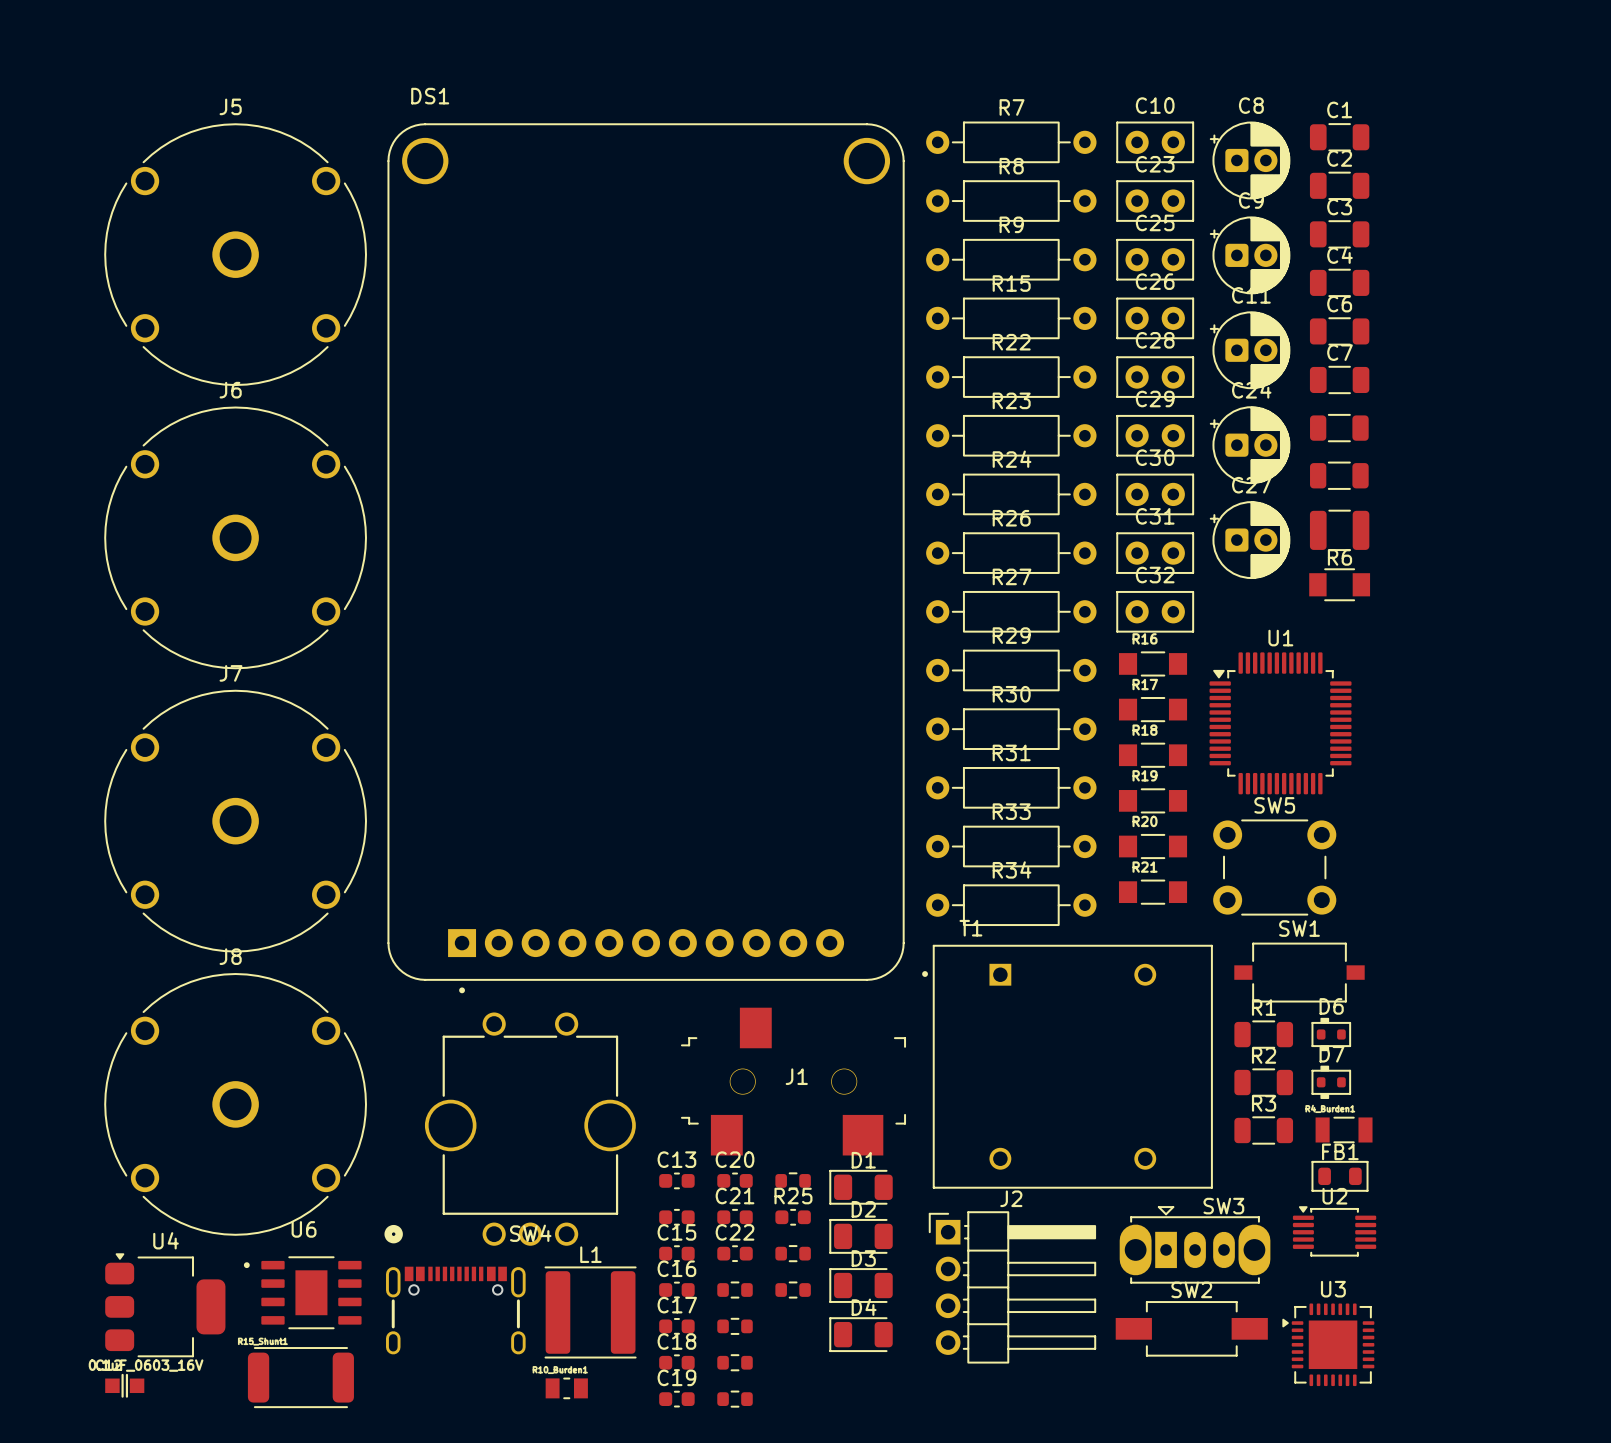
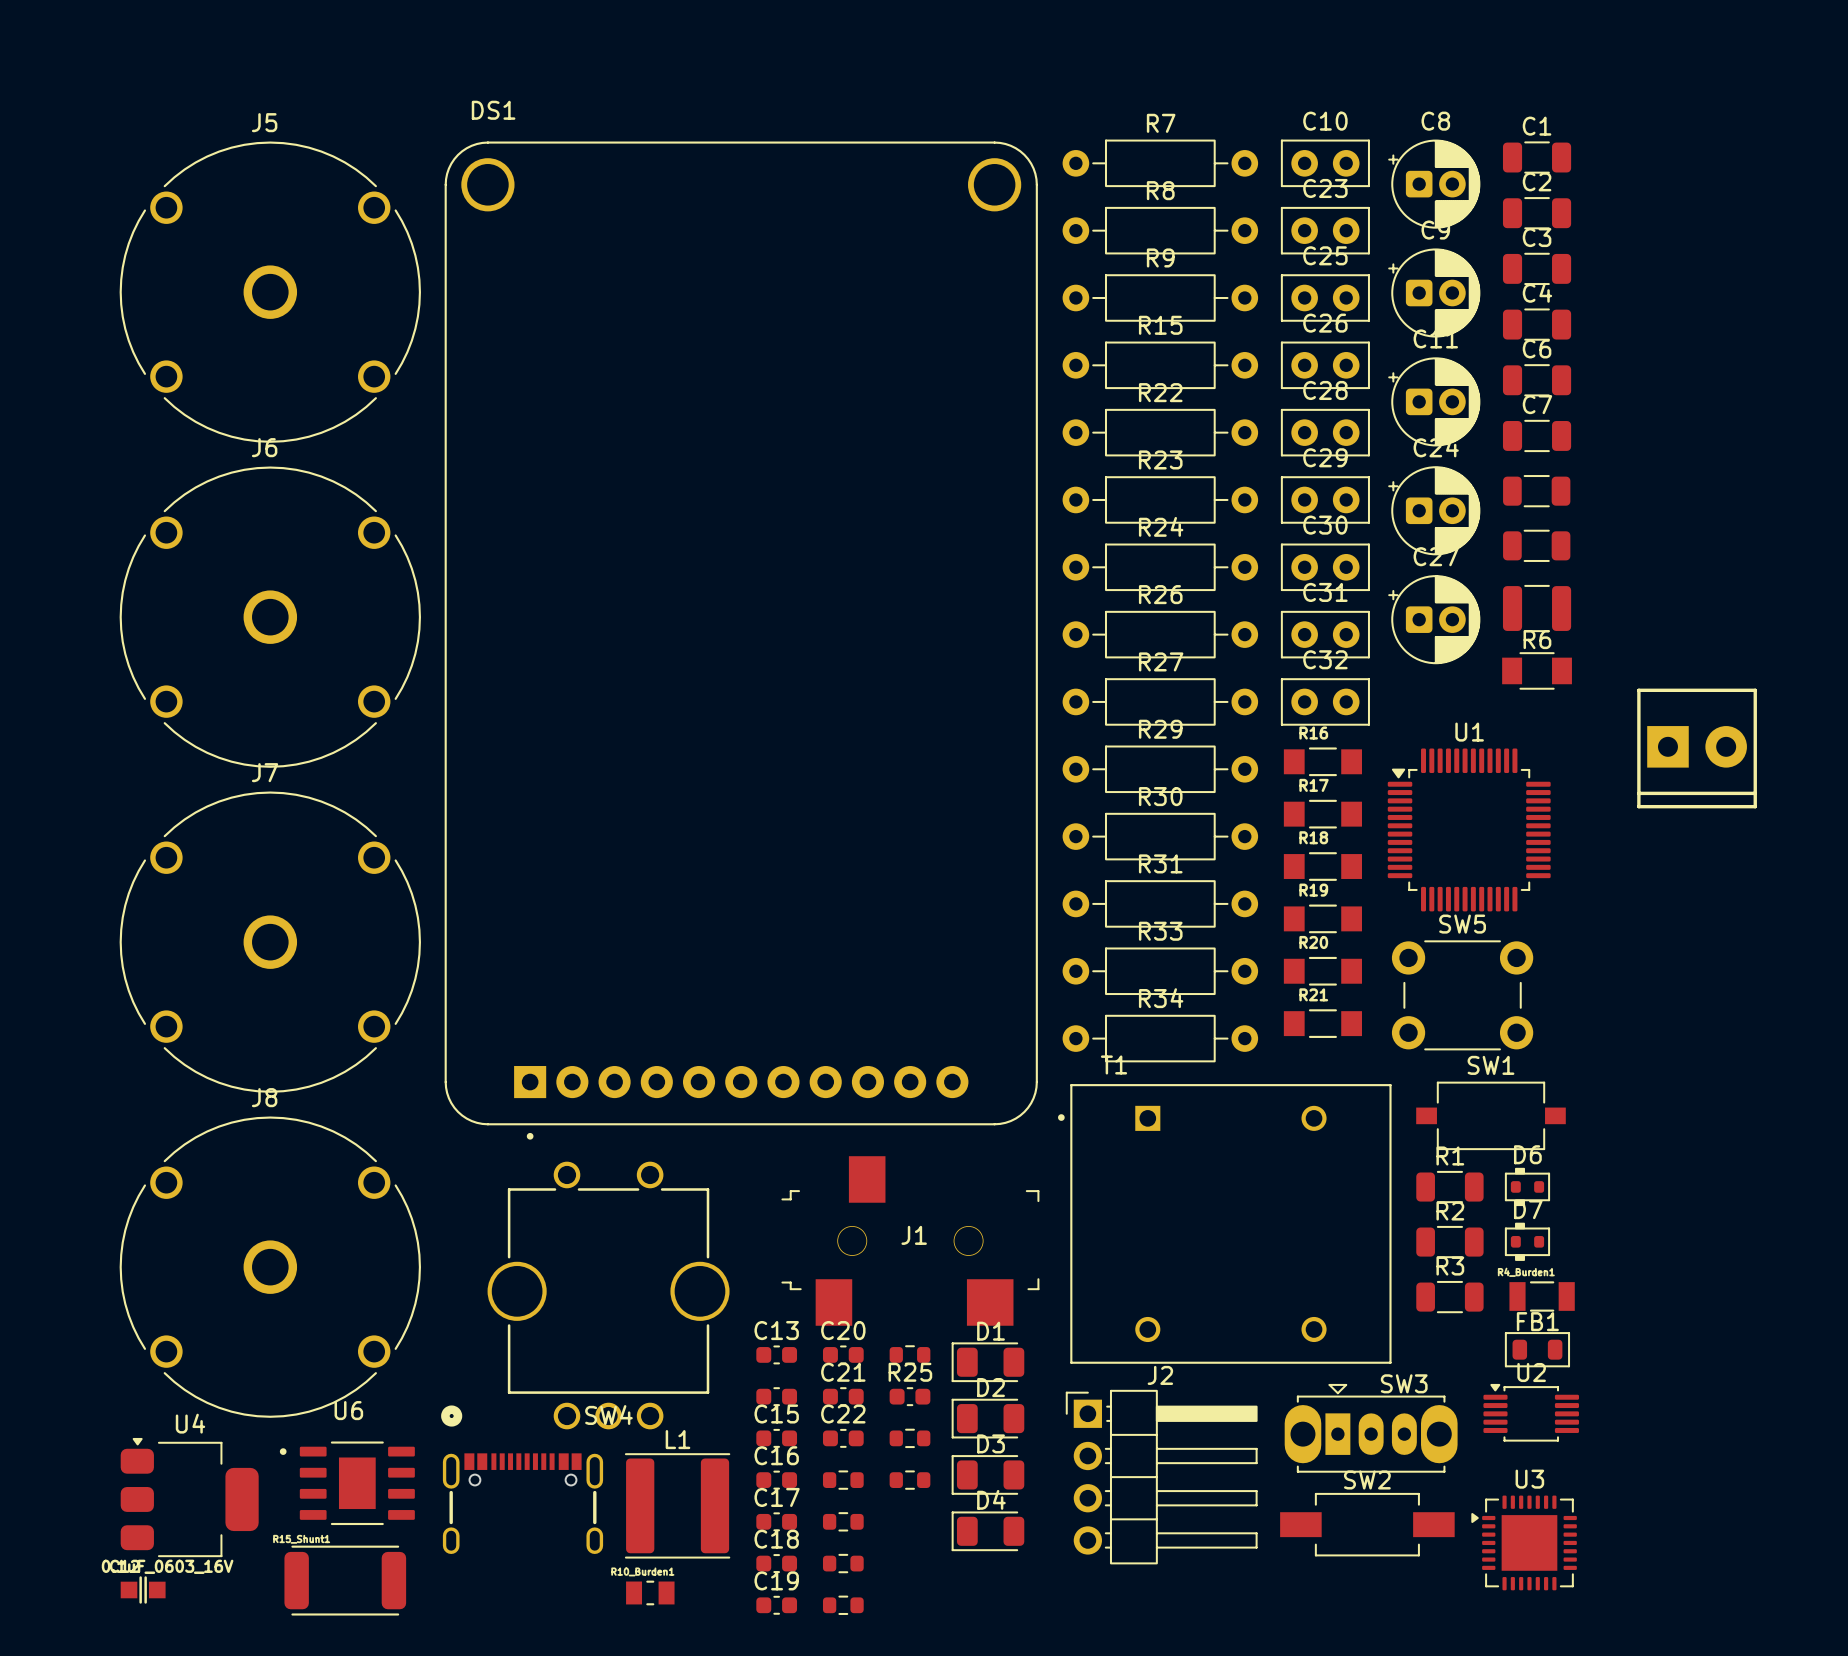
part: none -> (1697, 748)

